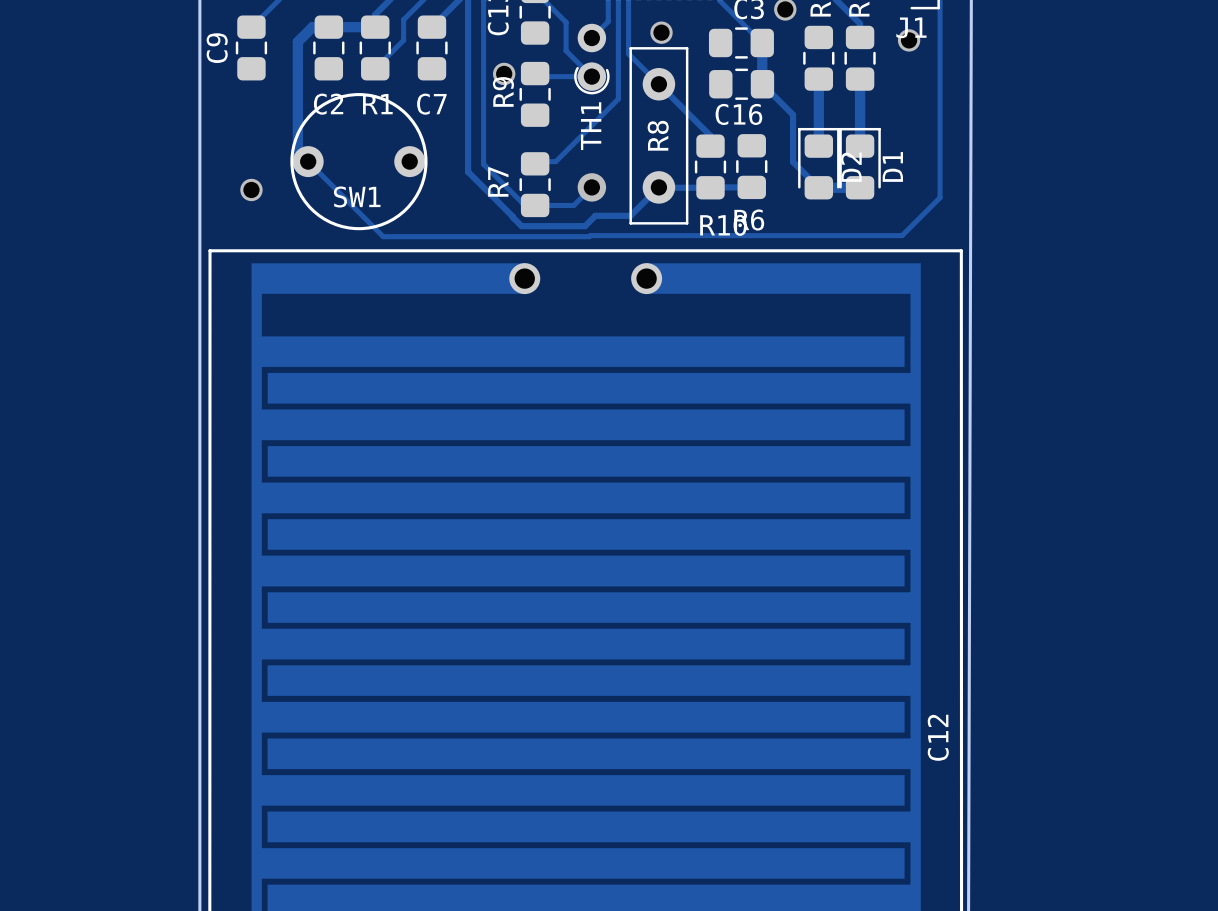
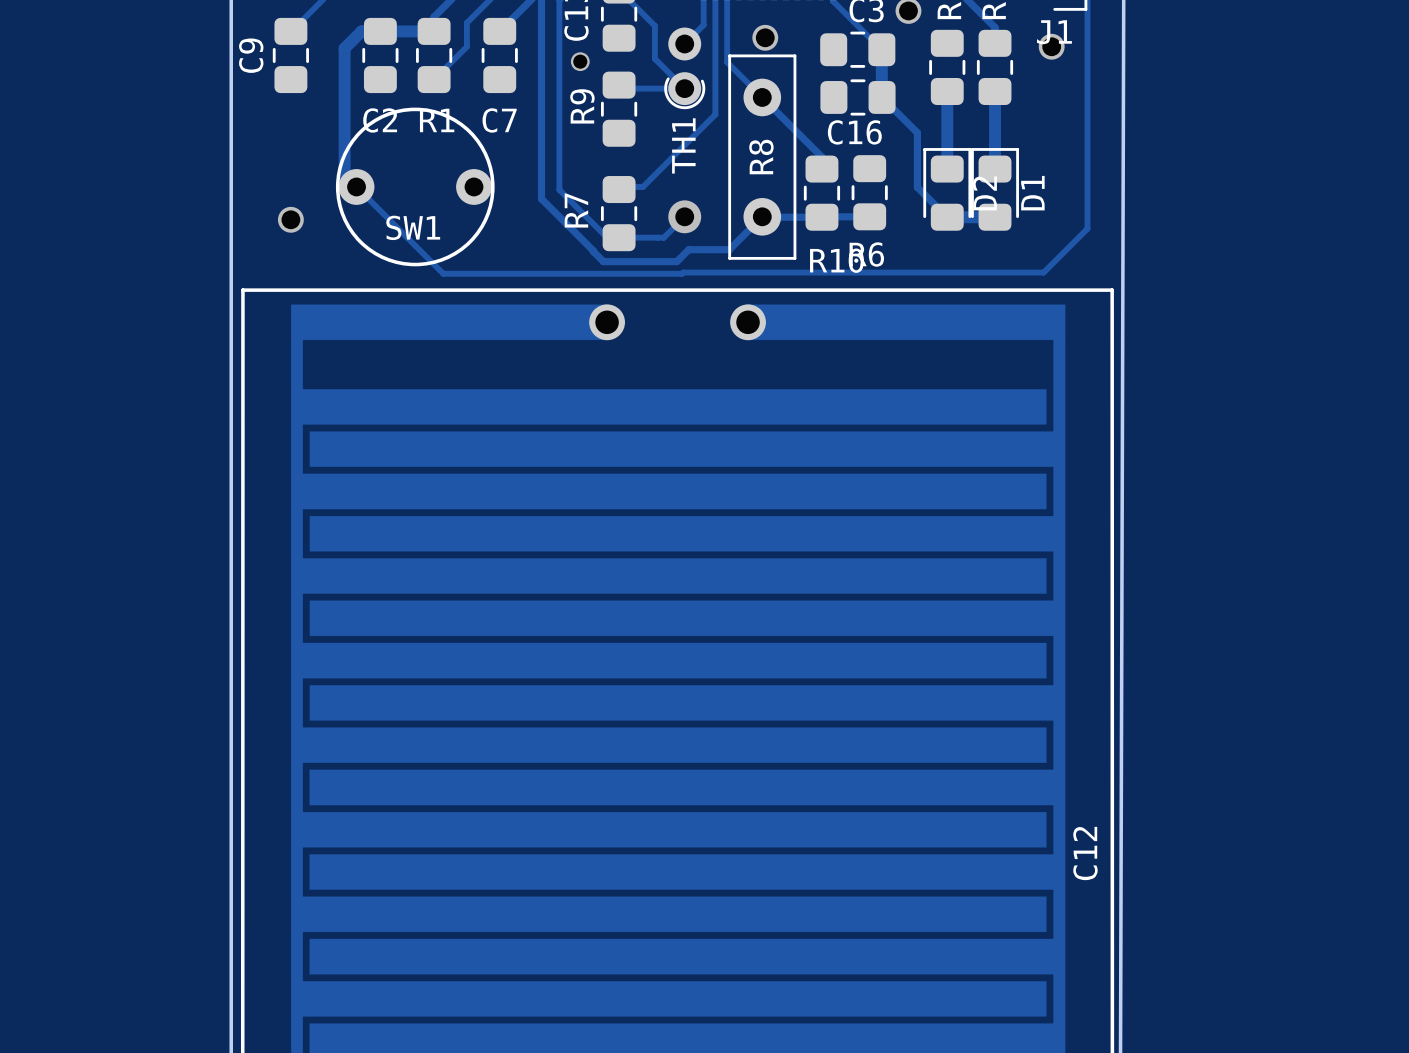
via: none -> (580, 61)
via: (504, 73) -> none

